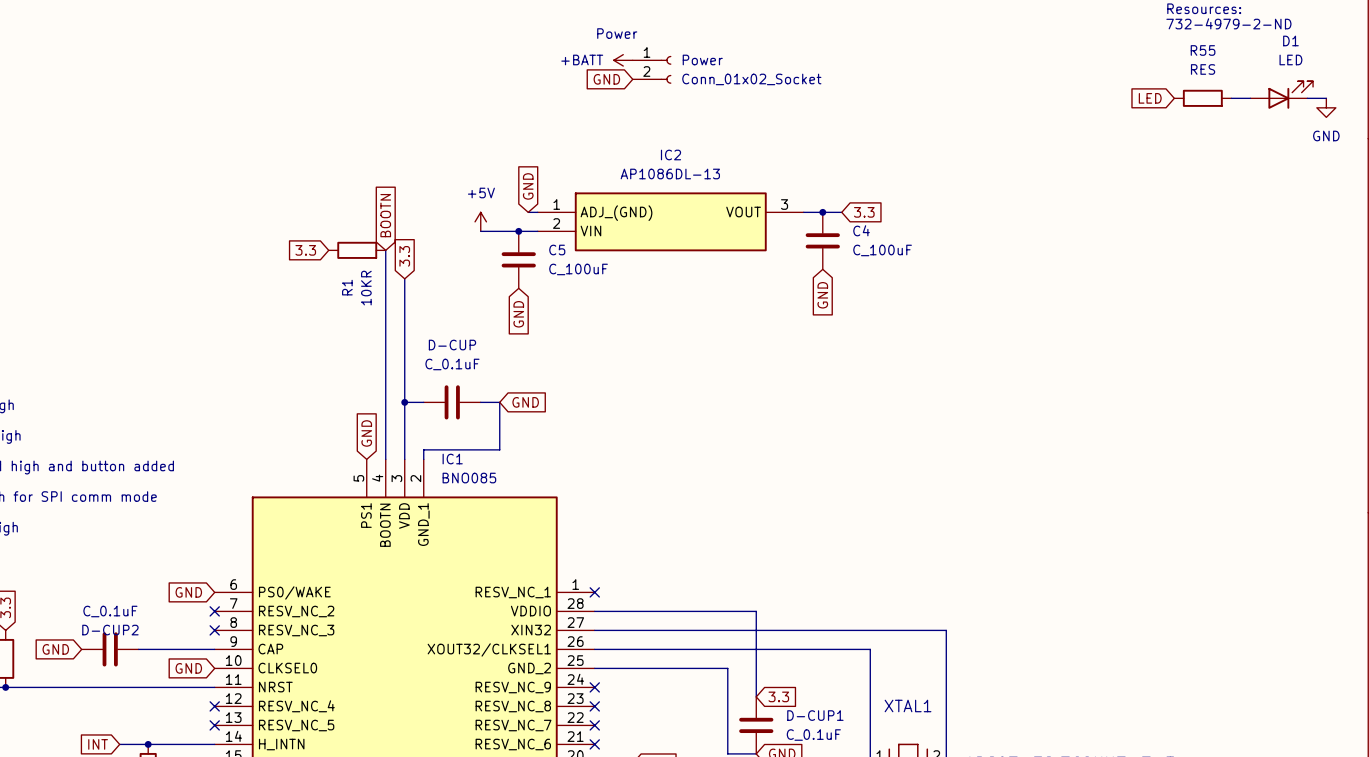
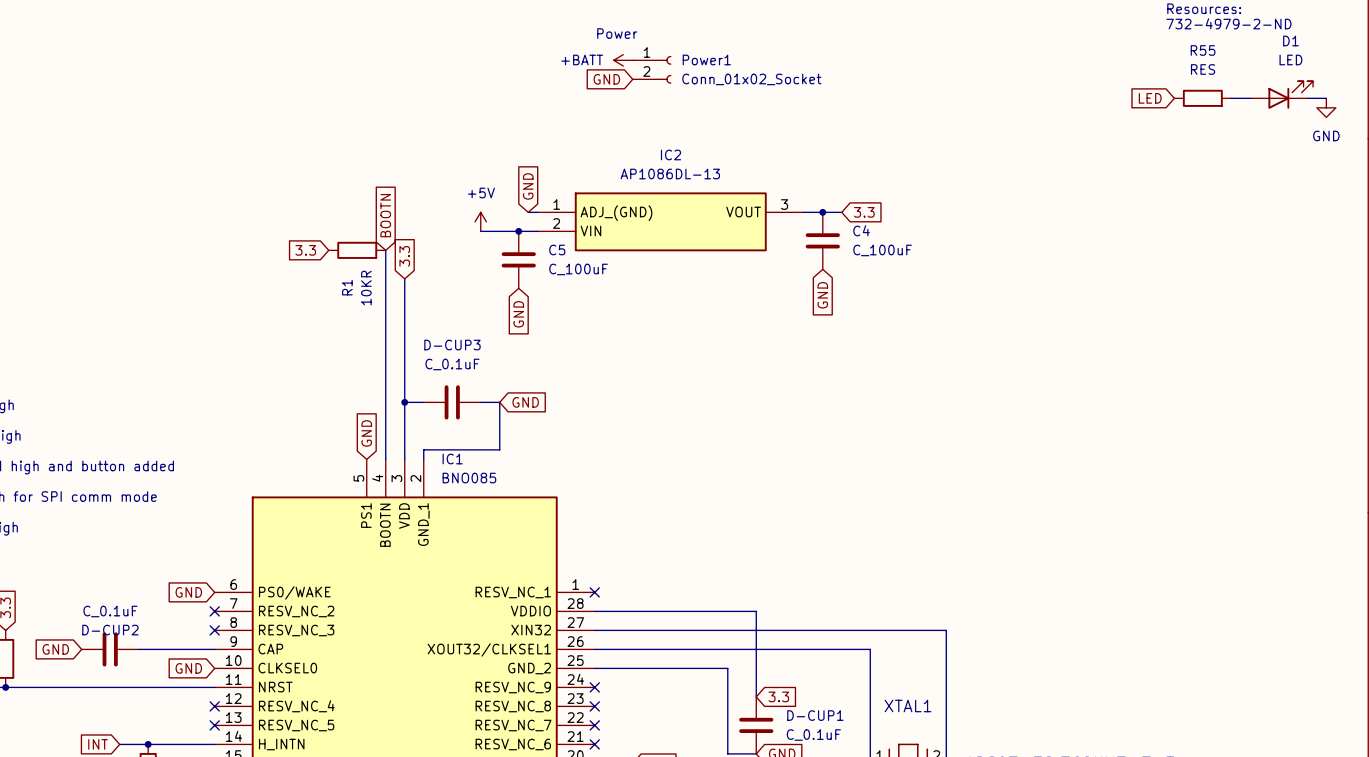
Power name: Power (702, 59) -> Power1 (706, 59)
D-CUP name: D-CUP (452, 345) -> D-CUP3 (452, 345)

